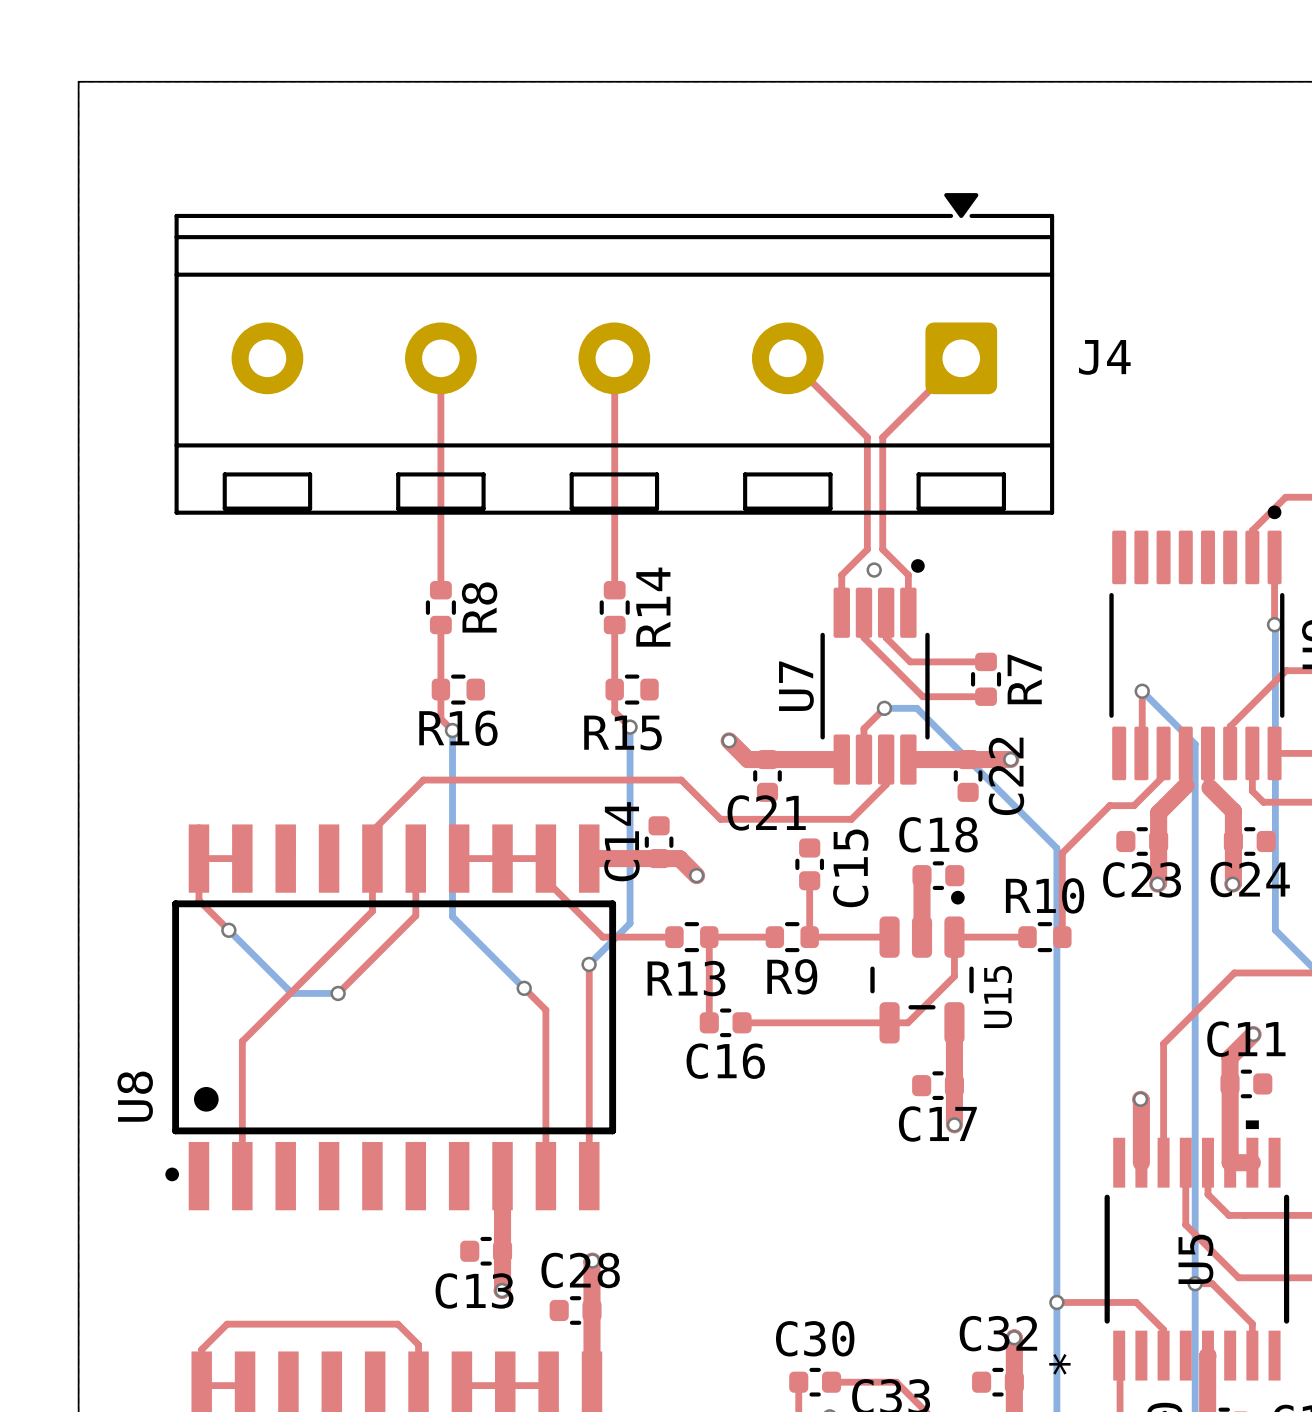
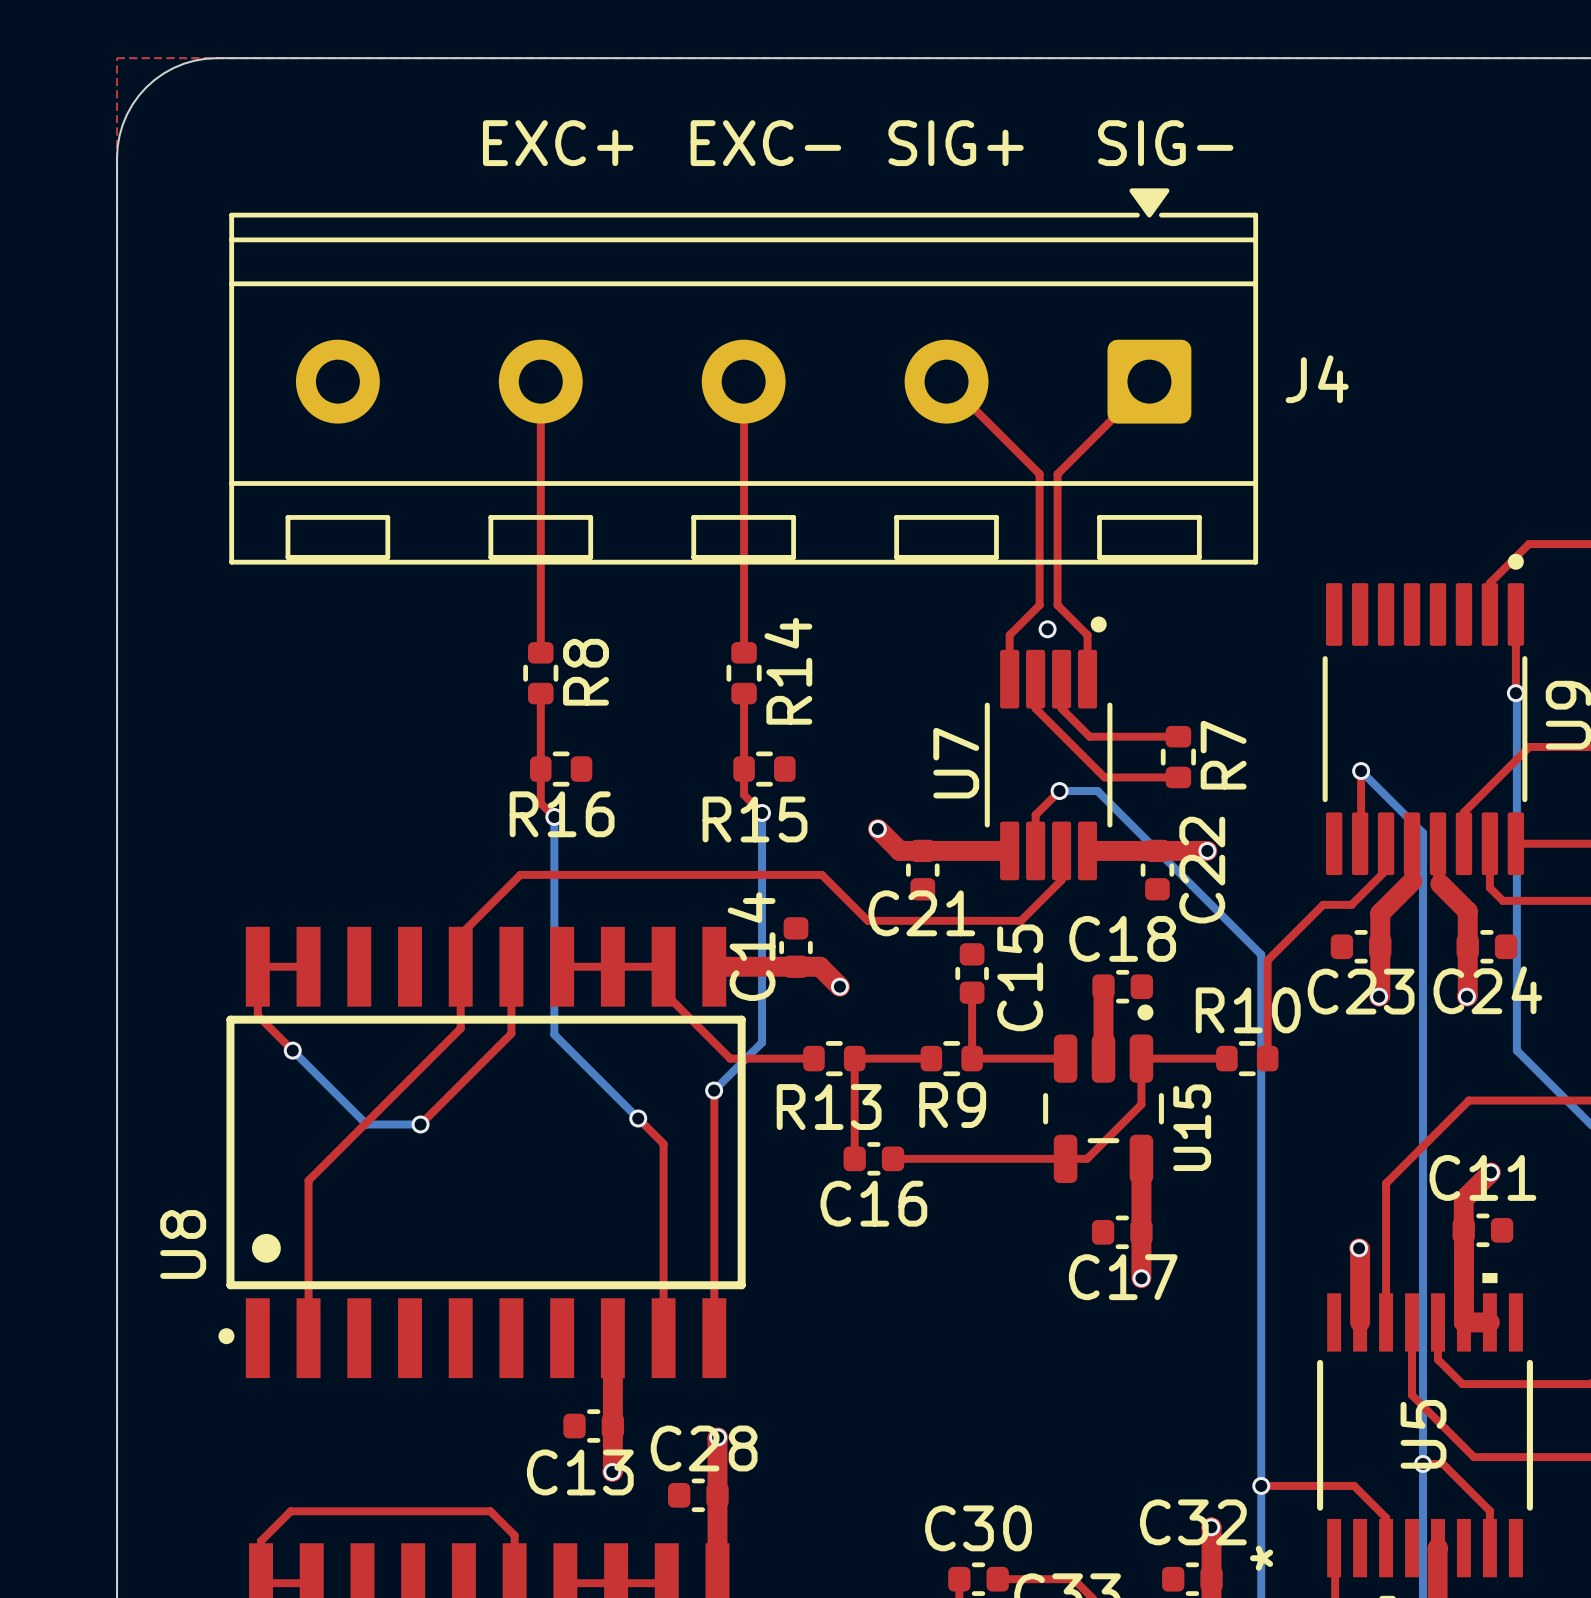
board edge: (163, 81) (78, 81) (78, 167) -> (216, 58) (194, 60) (173, 68) (146, 87) (132, 104) (122, 125) (117, 158)
text: none -> EXC+ (558, 143)
text: none -> EXC- (765, 143)
text: none -> SIG+ (956, 143)
text: none -> SIG- (1165, 143)

